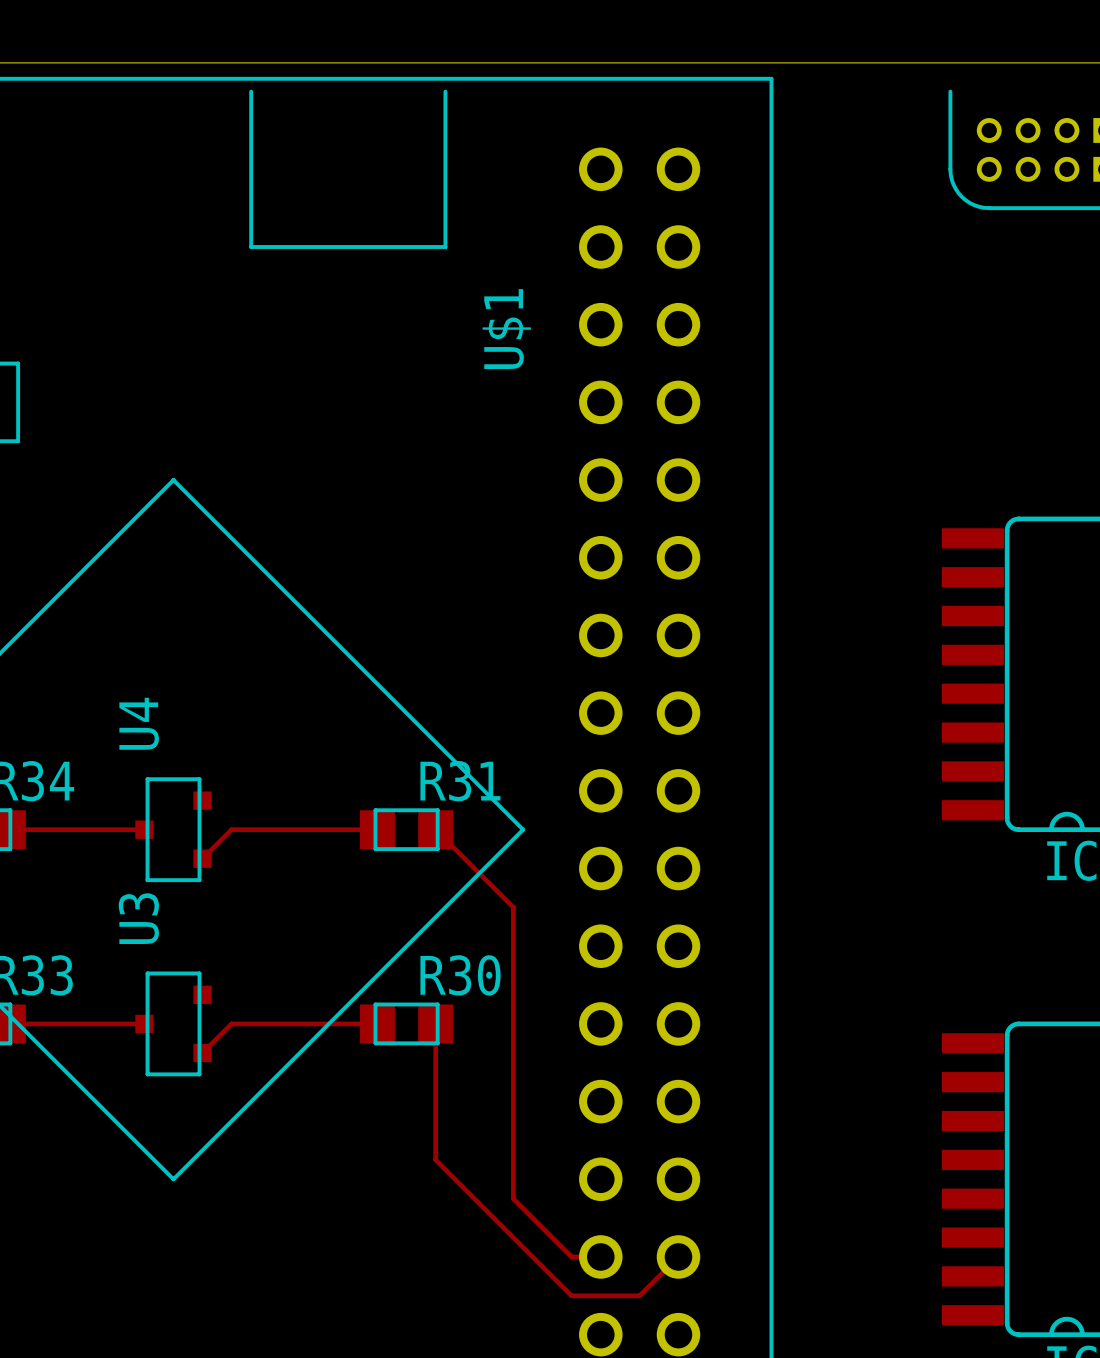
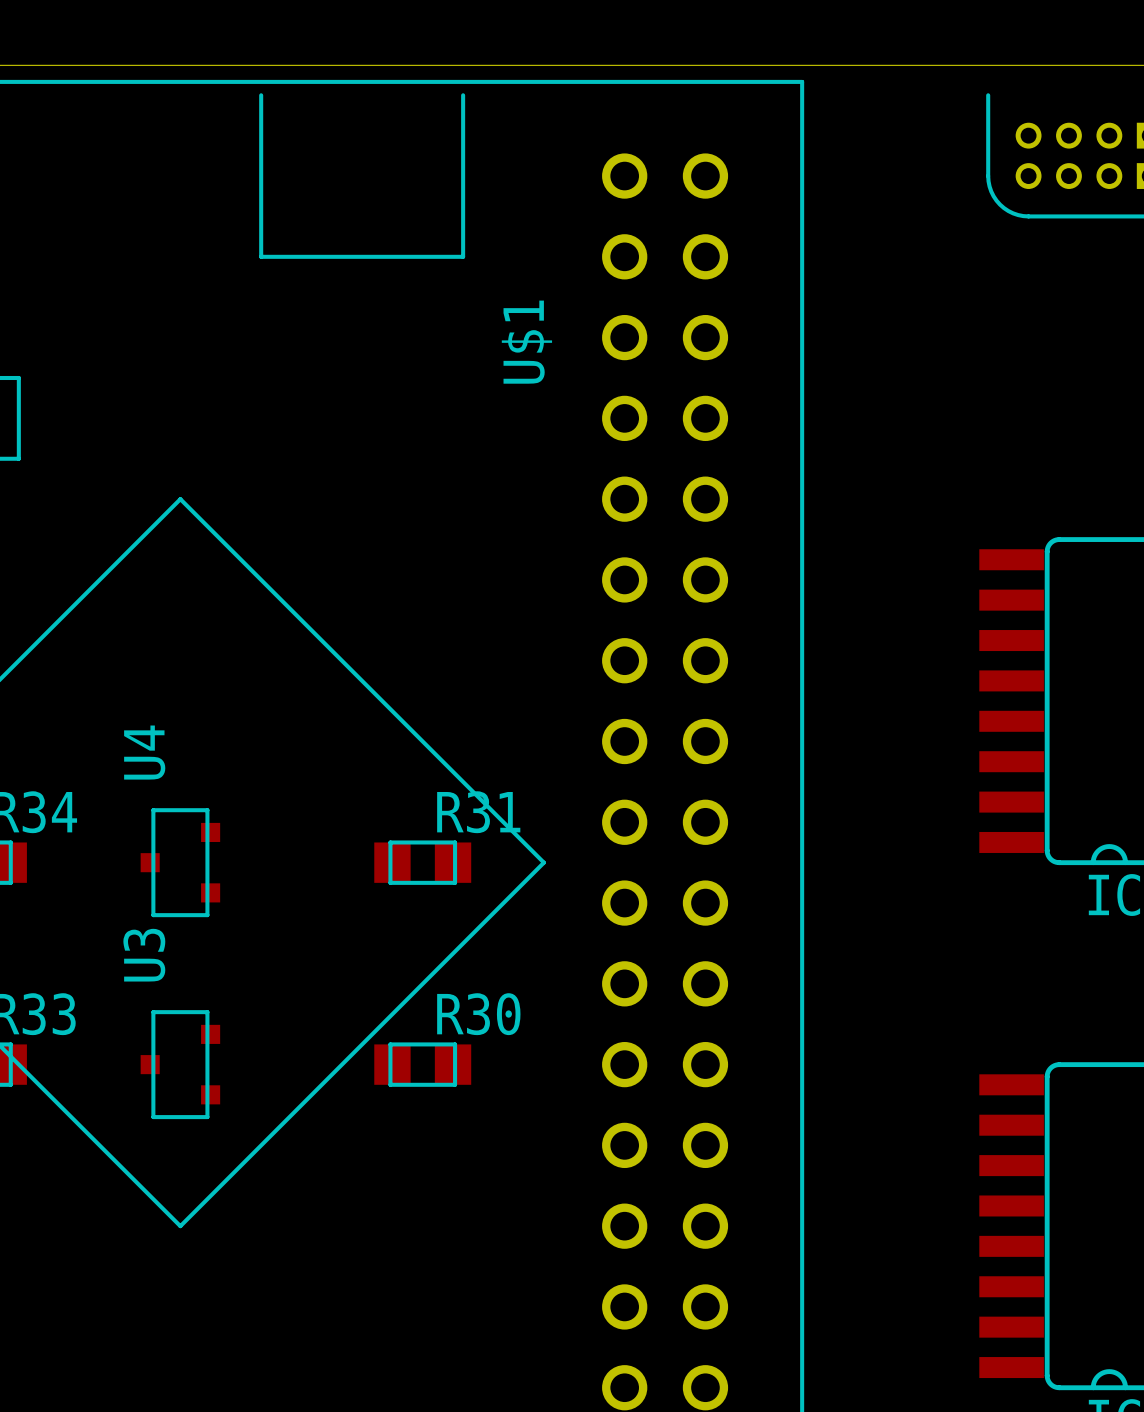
top track: (8, 829) (144, 829) -> none
top track: (377, 829) (231, 829) (202, 858) -> none
top track: (435, 829) (513, 907) (513, 1198) (571, 1256) (600, 1256) -> none
top track: (8, 1023) (144, 1023) -> none
top track: (377, 1023) (231, 1023) (202, 1052) -> none
top track: (435, 1023) (435, 1159) (571, 1295) (639, 1295) (678, 1256) -> none

